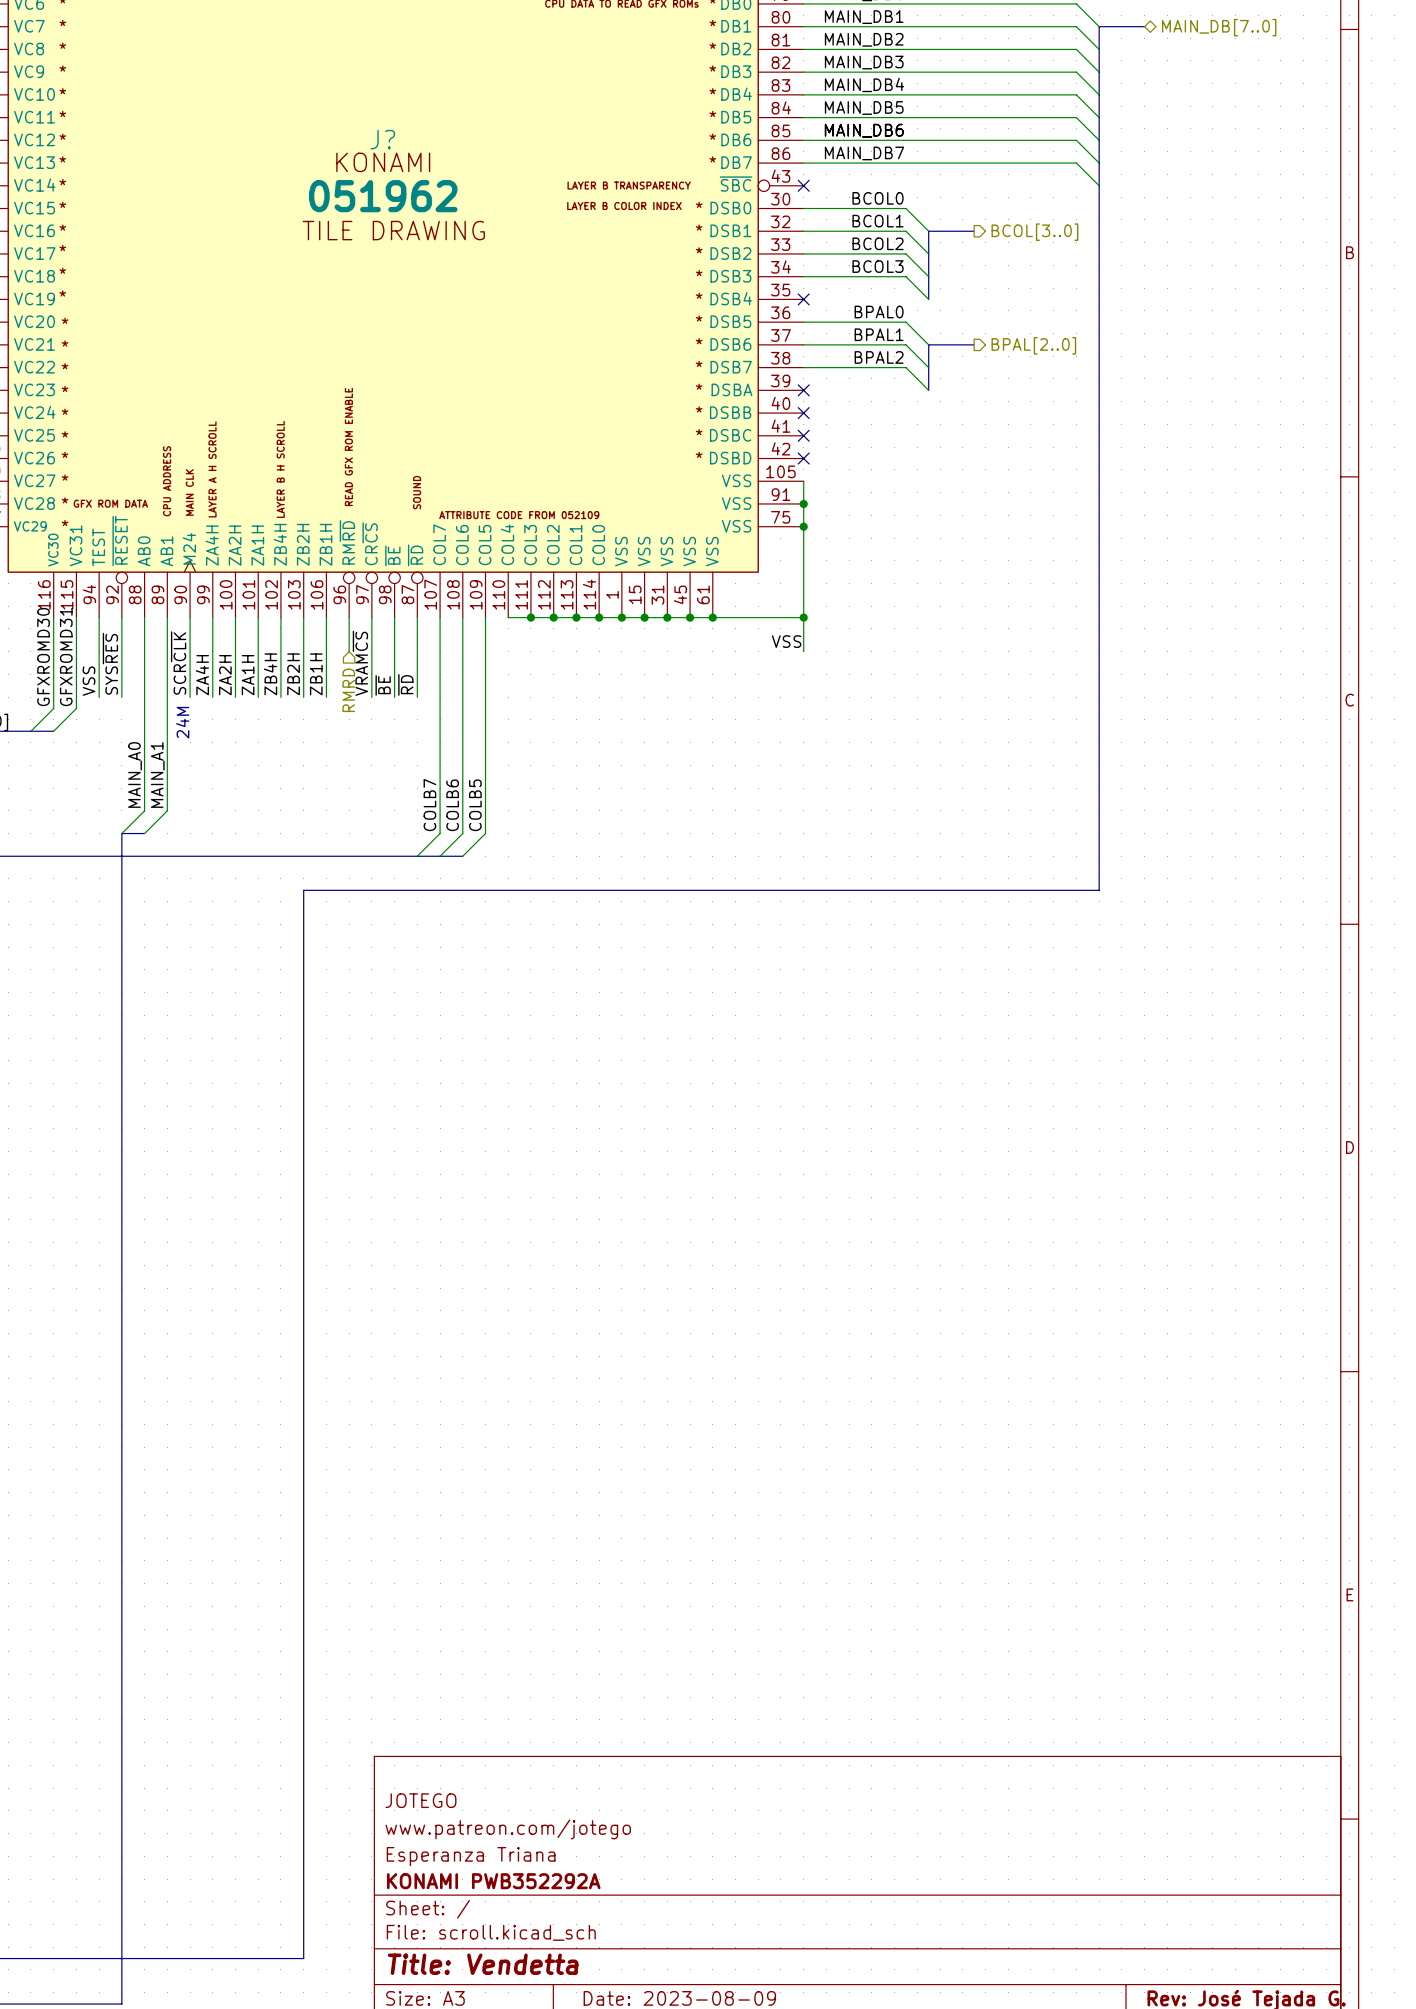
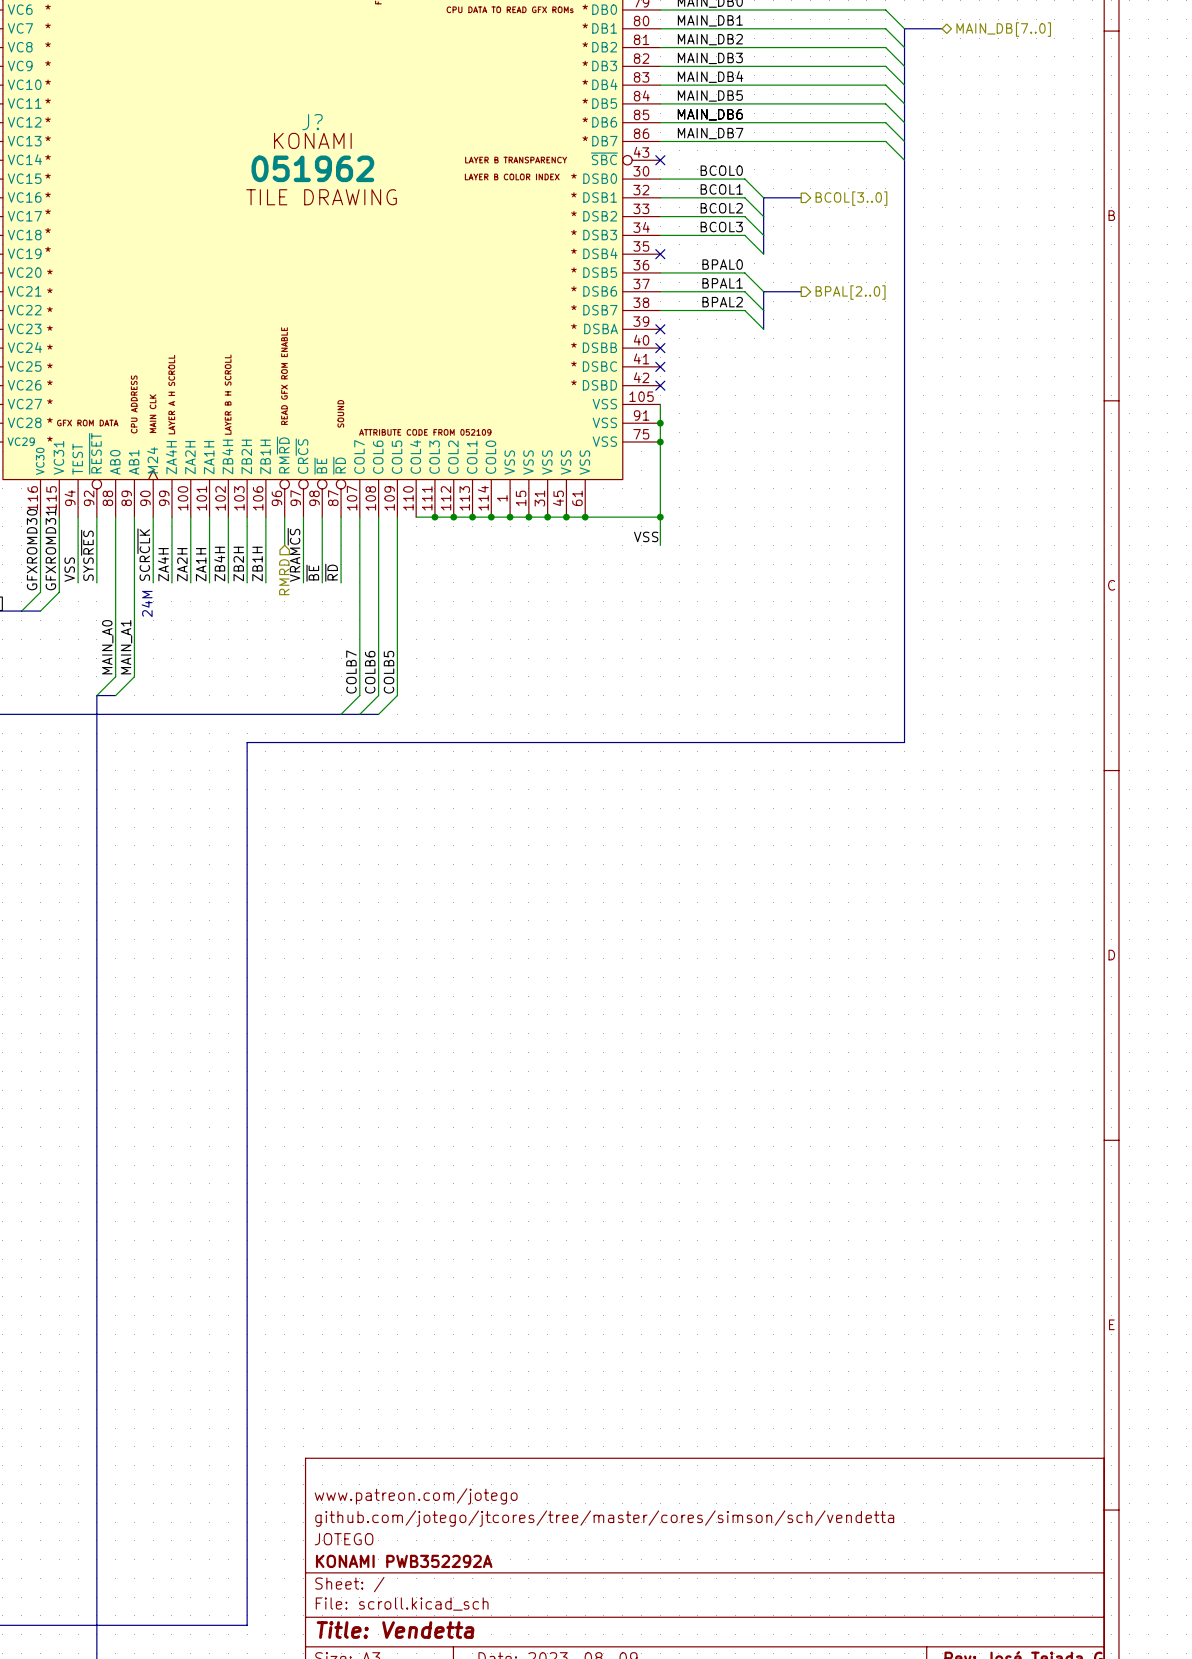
title block: JOTEGO (420, 1800) -> www.patreon.com/jotego (416, 1496)
title block: www.patreon.com/jotego (508, 1829) -> github.com/jotego/jtcores/tree/master/cores/simson/sch/vendetta (604, 1518)
title block: Esperanza Triana (471, 1856) -> JOTEGO (344, 1539)

